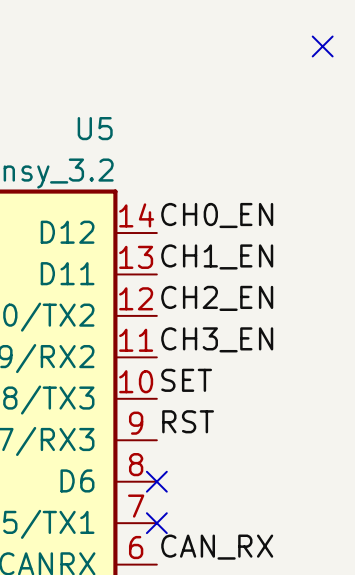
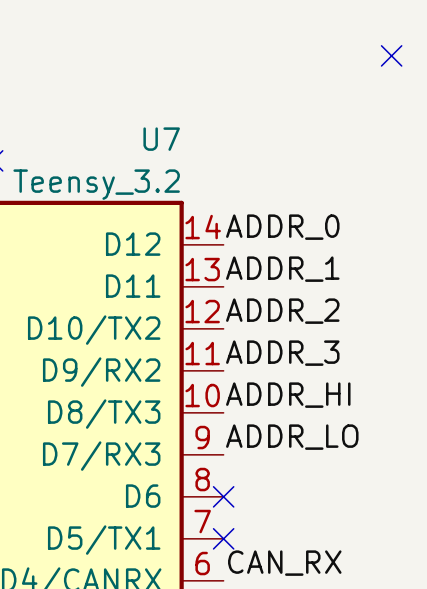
U5 name: U5 (95, 128) -> U7 (161, 139)
label: CH0_EN (217, 215) -> ADDR_0 (282, 227)
label: CH1_EN (217, 256) -> ADDR_1 (282, 269)
label: CH2_EN (217, 298) -> ADDR_2 (282, 311)
label: CH3_EN (217, 339) -> ADDR_3 (282, 353)
label: SET (186, 380) -> ADDR_HI (288, 395)
label: RST (188, 421) -> ADDR_LO (292, 437)

